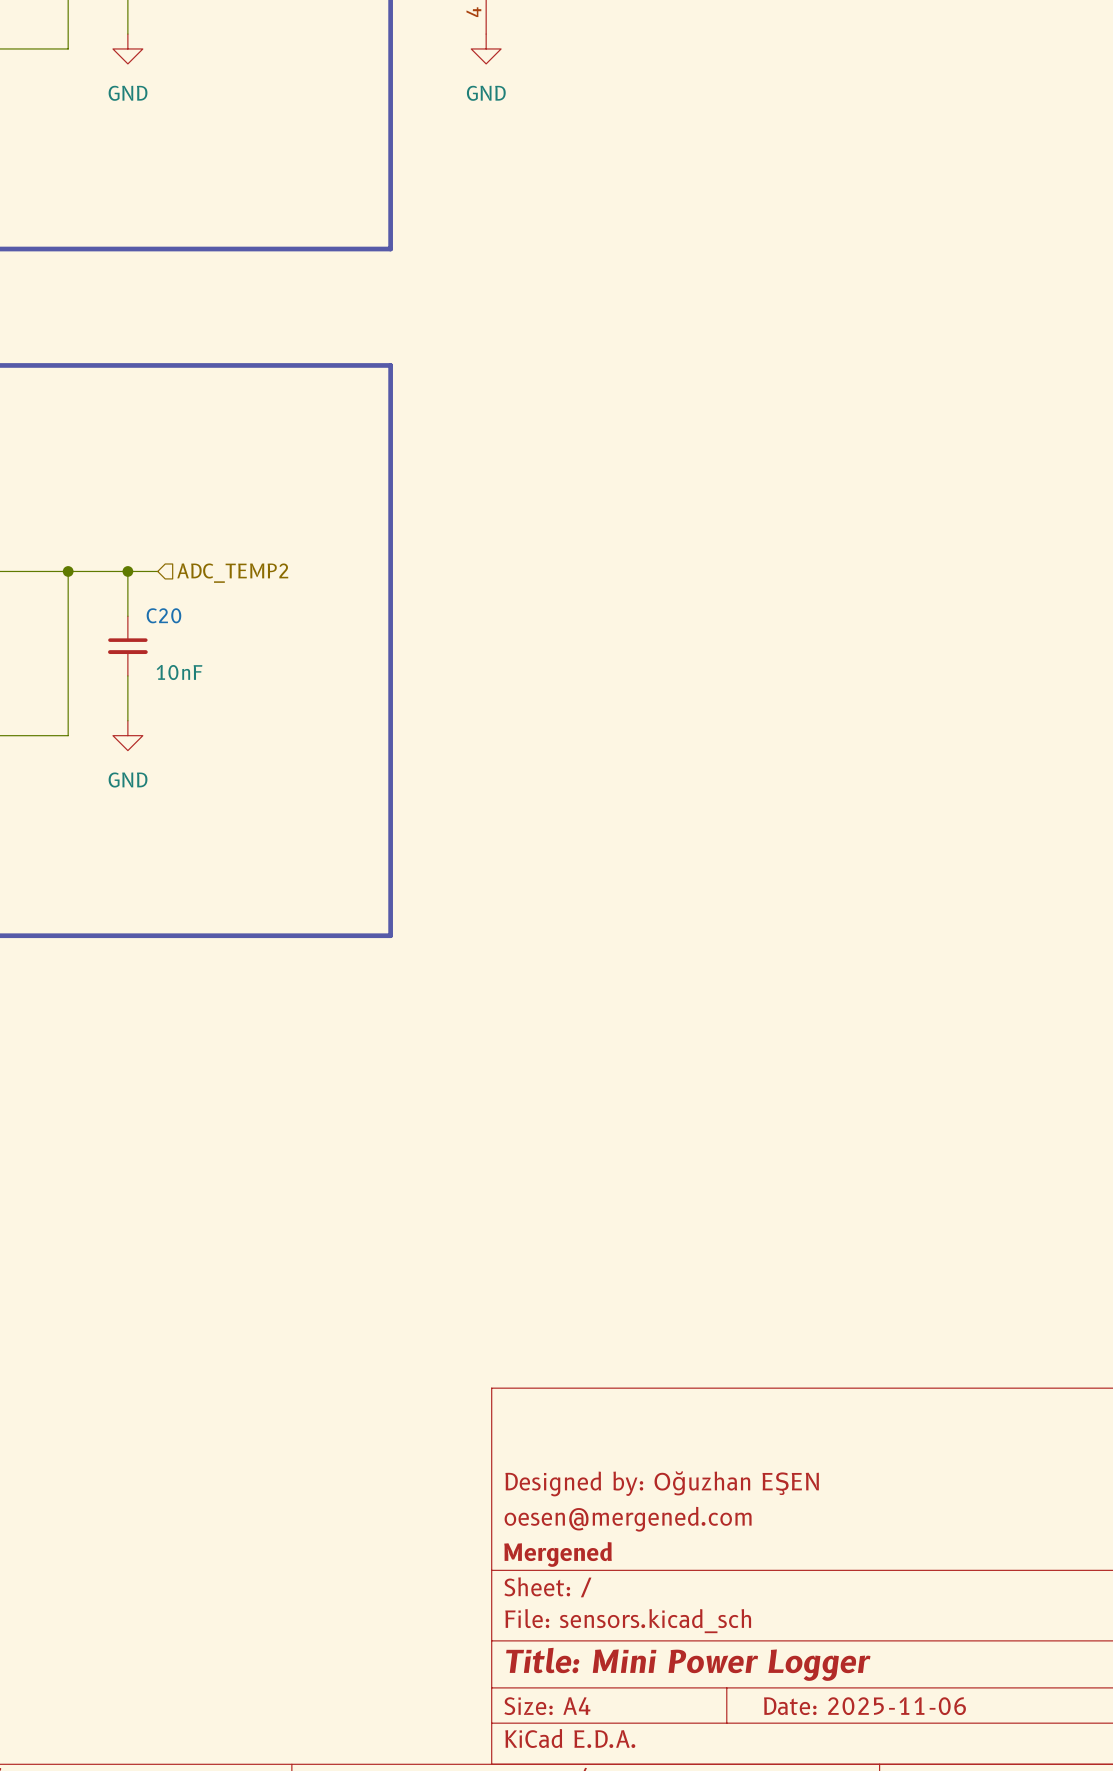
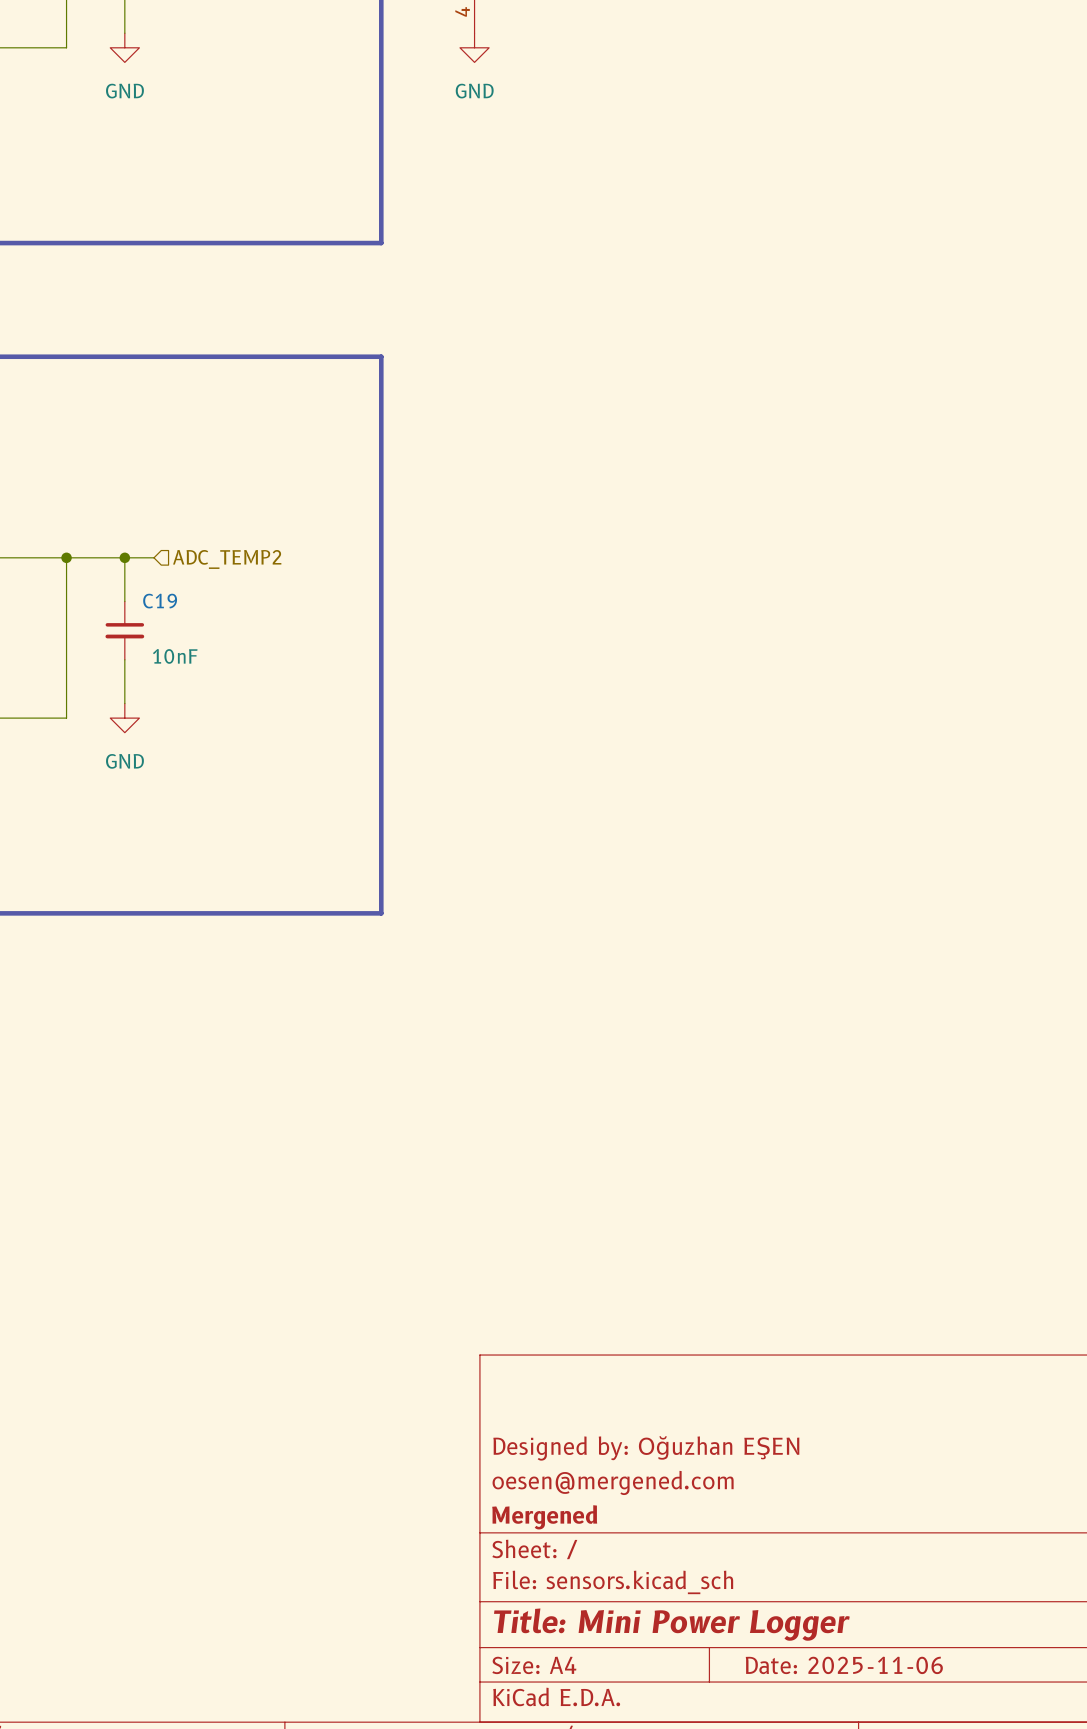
C20 name: C20 (163, 615) -> C19 (160, 601)

